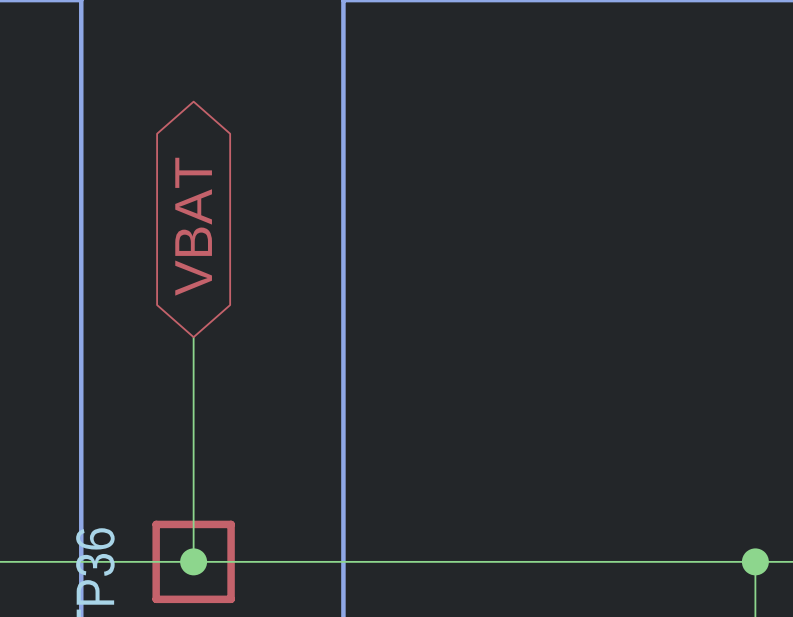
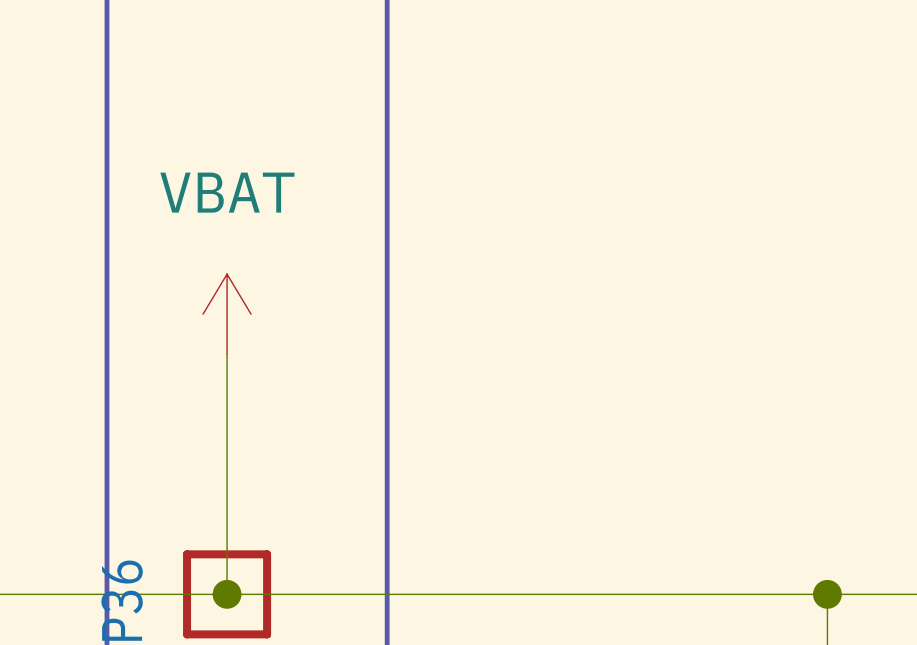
global label: VBAT (193, 226) -> none
power symbol: none -> VBAT (227, 314)

